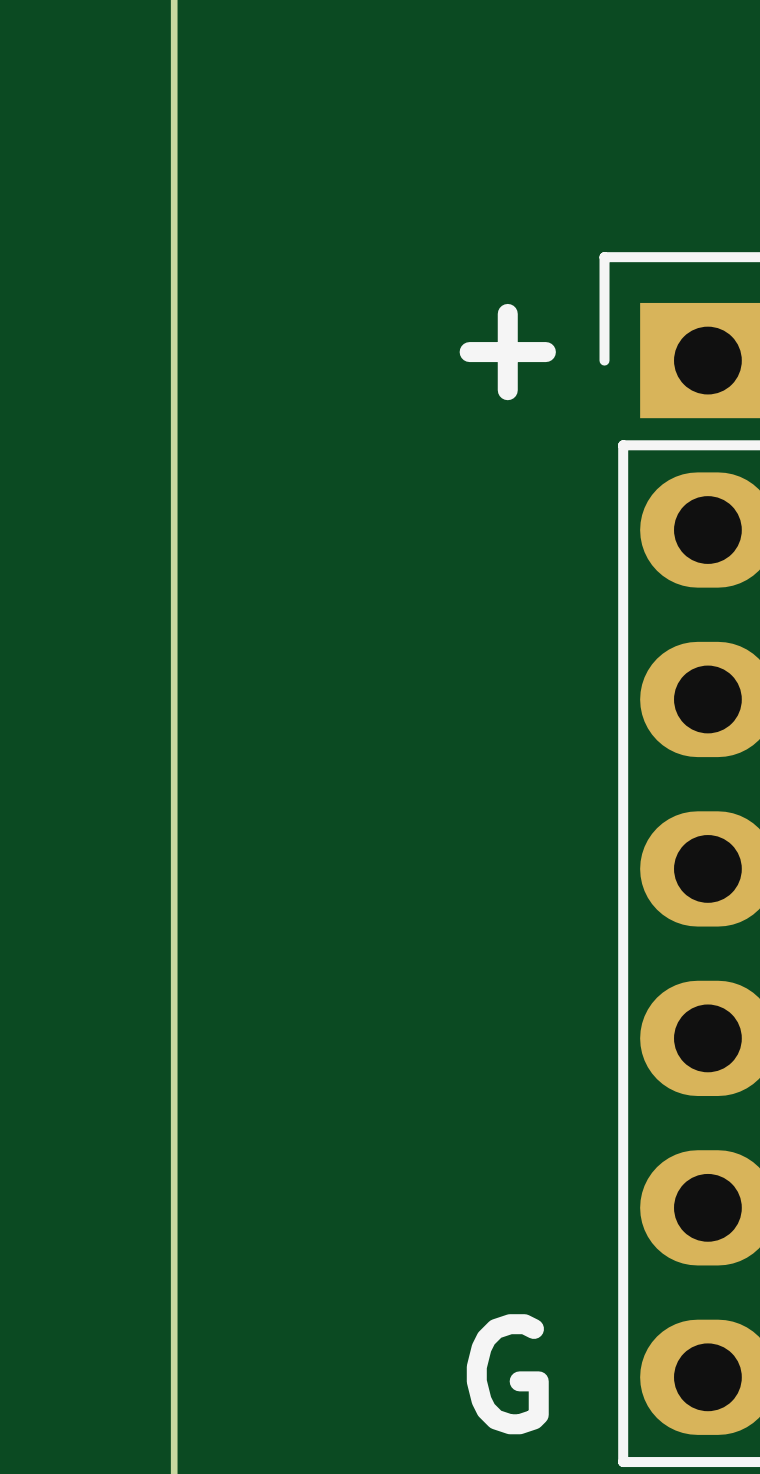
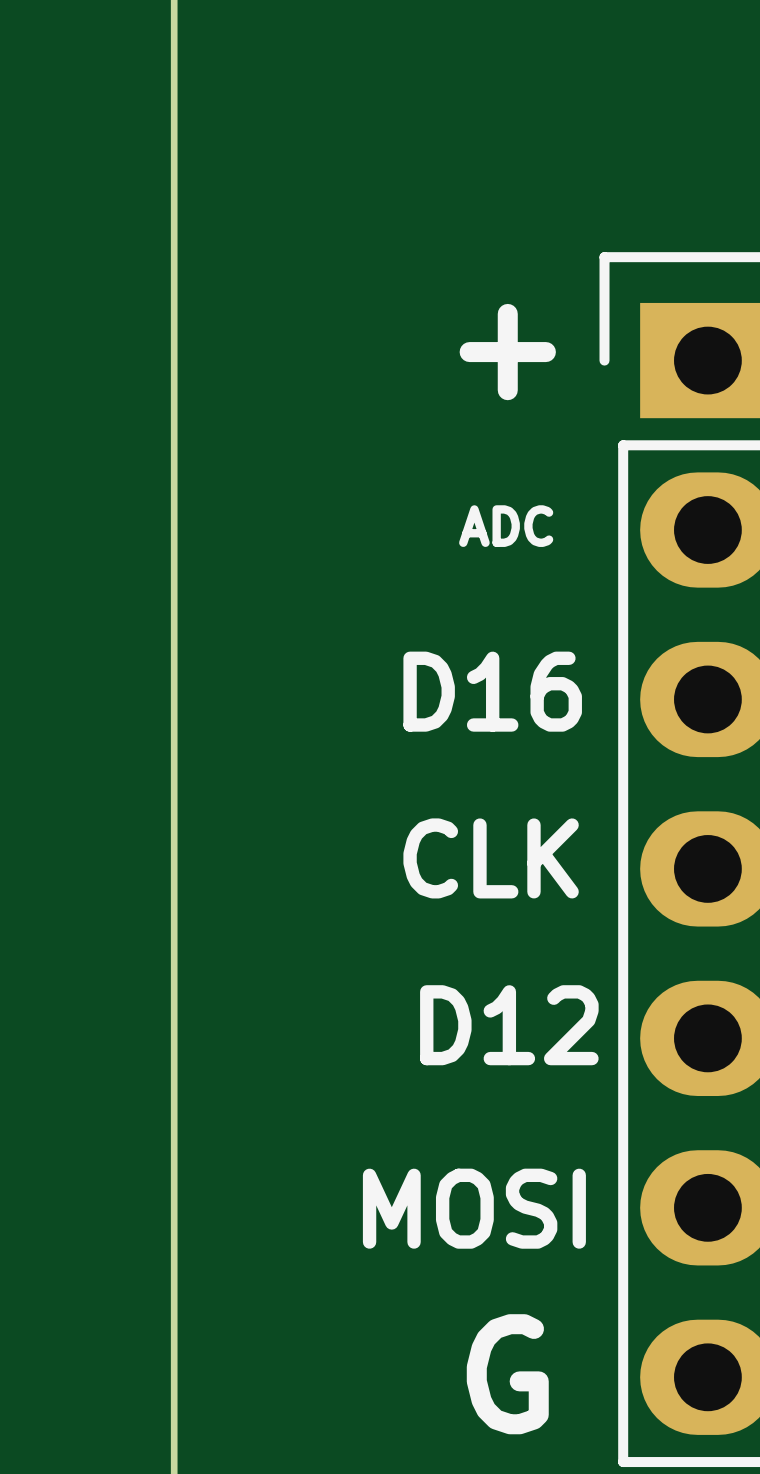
text: none -> ADC (506, 526)
text: none -> D16 (492, 691)
text: none -> CLK (491, 858)
text: none -> D12 (509, 1025)
text: none -> MOSI (474, 1208)

